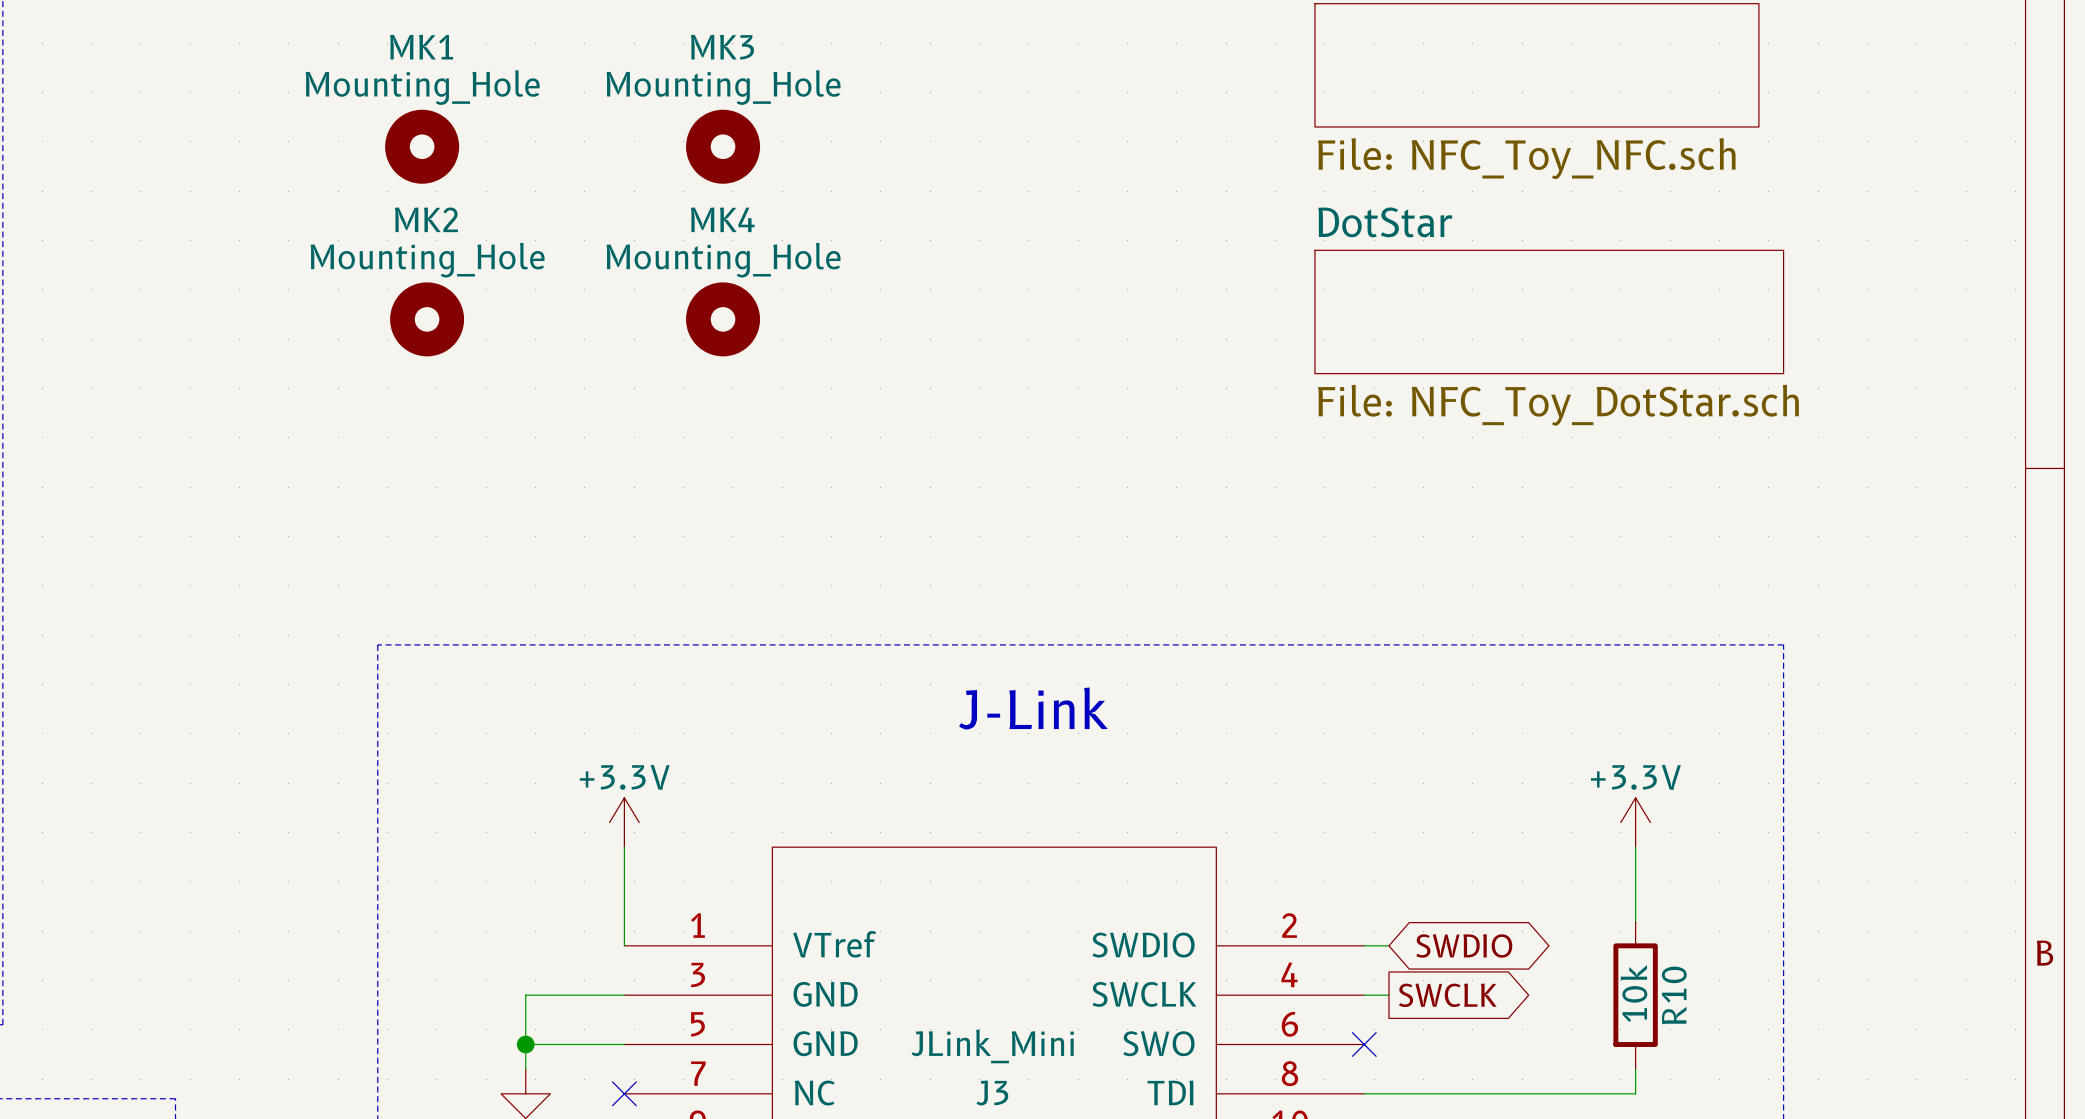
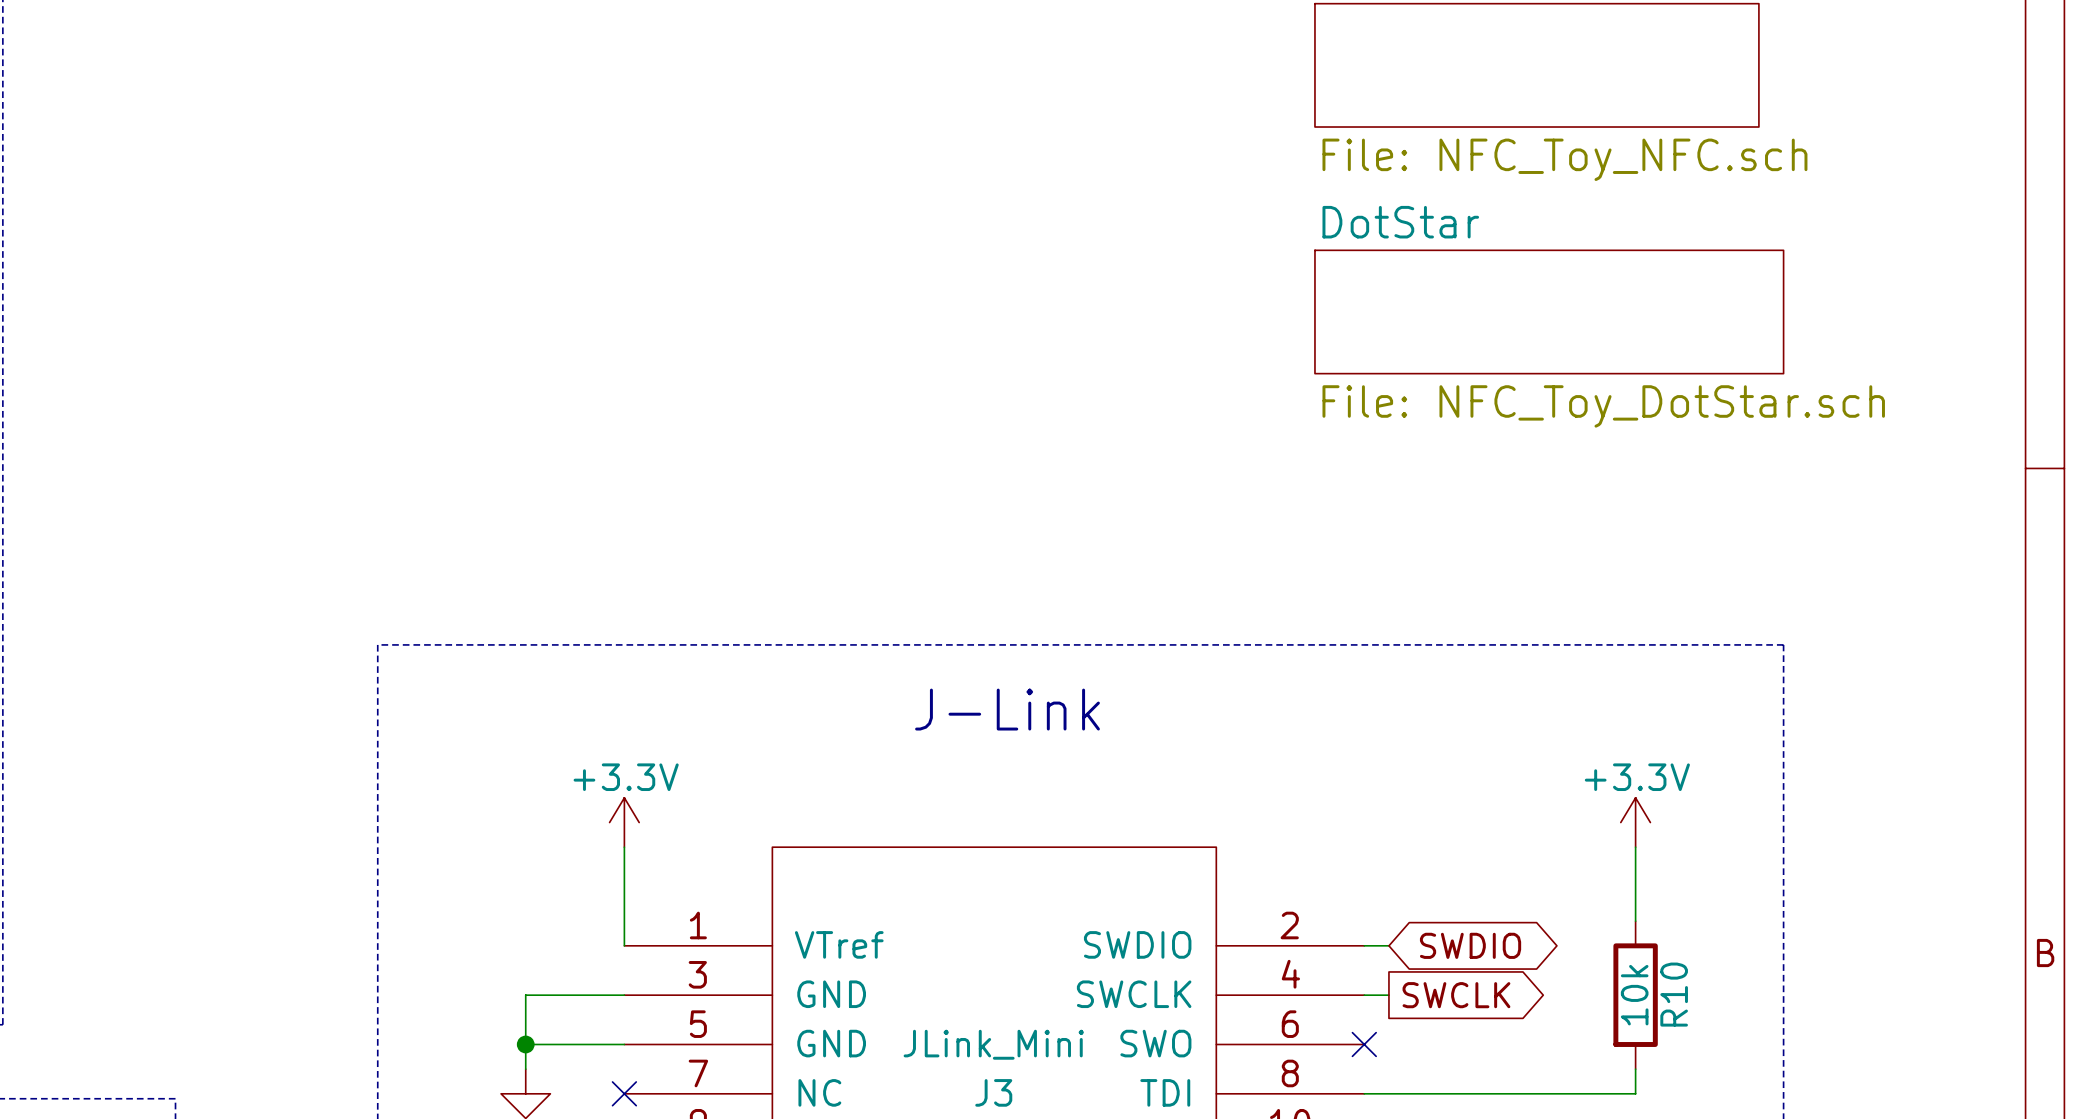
MK1: Mounting_Hole (422, 146) -> none
MK3: Mounting_Hole (723, 146) -> none
MK2: Mounting_Hole (427, 319) -> none
MK4: Mounting_Hole (723, 319) -> none

